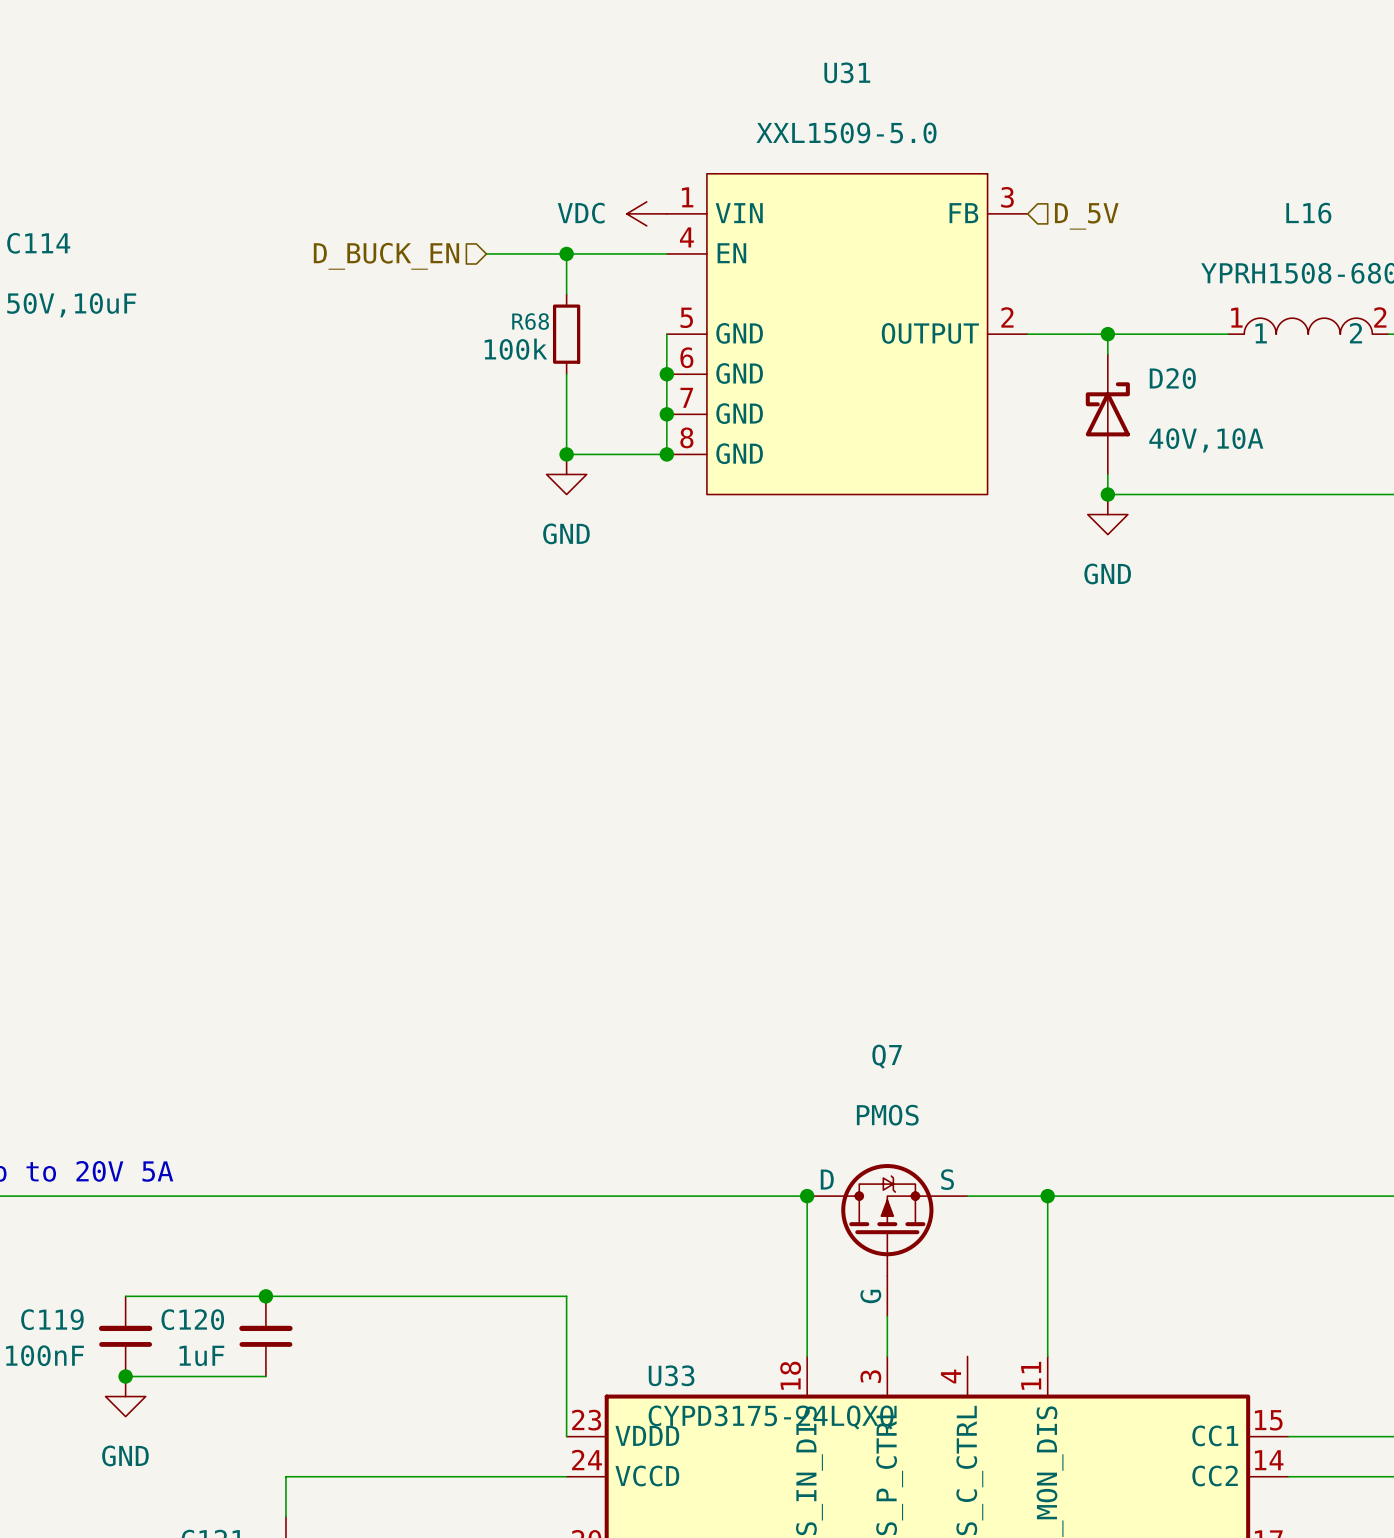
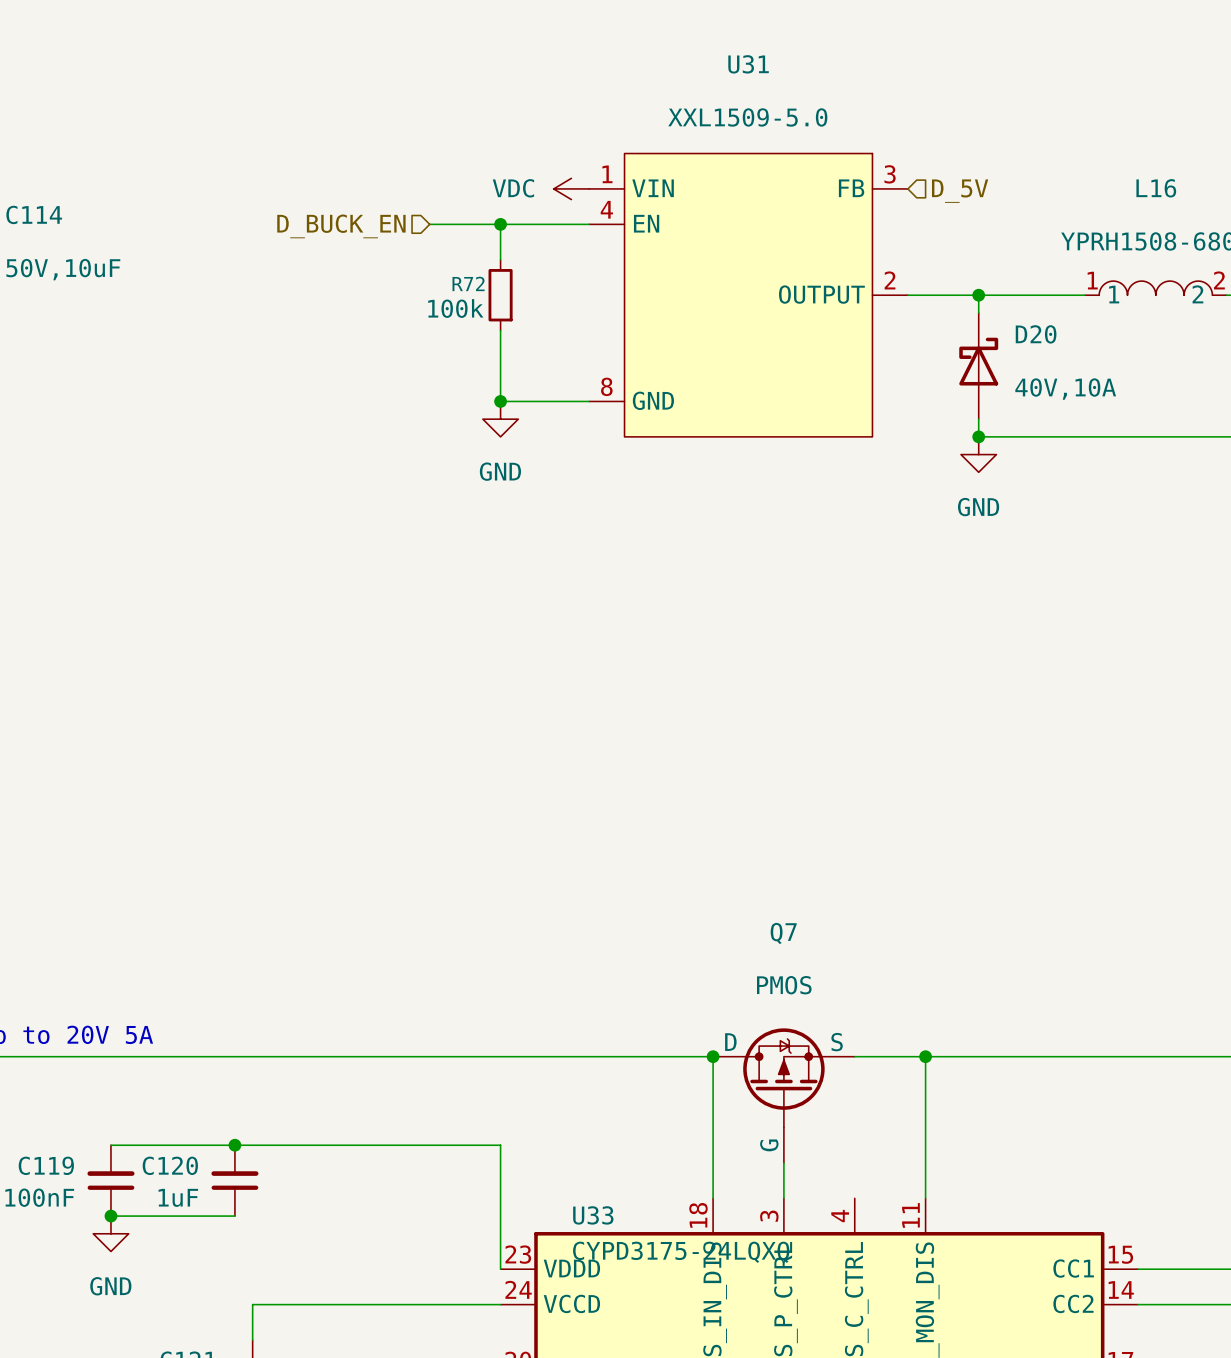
U31 symbol: [666, 173, 1028, 495] -> [589, 153, 908, 437]
R68 name: R68 (530, 321) -> R72 (468, 283)
wire: (666, 334) (666, 454) -> none
junction: (666, 374) -> none
junction: (666, 414) -> none
junction: (666, 454) -> none

